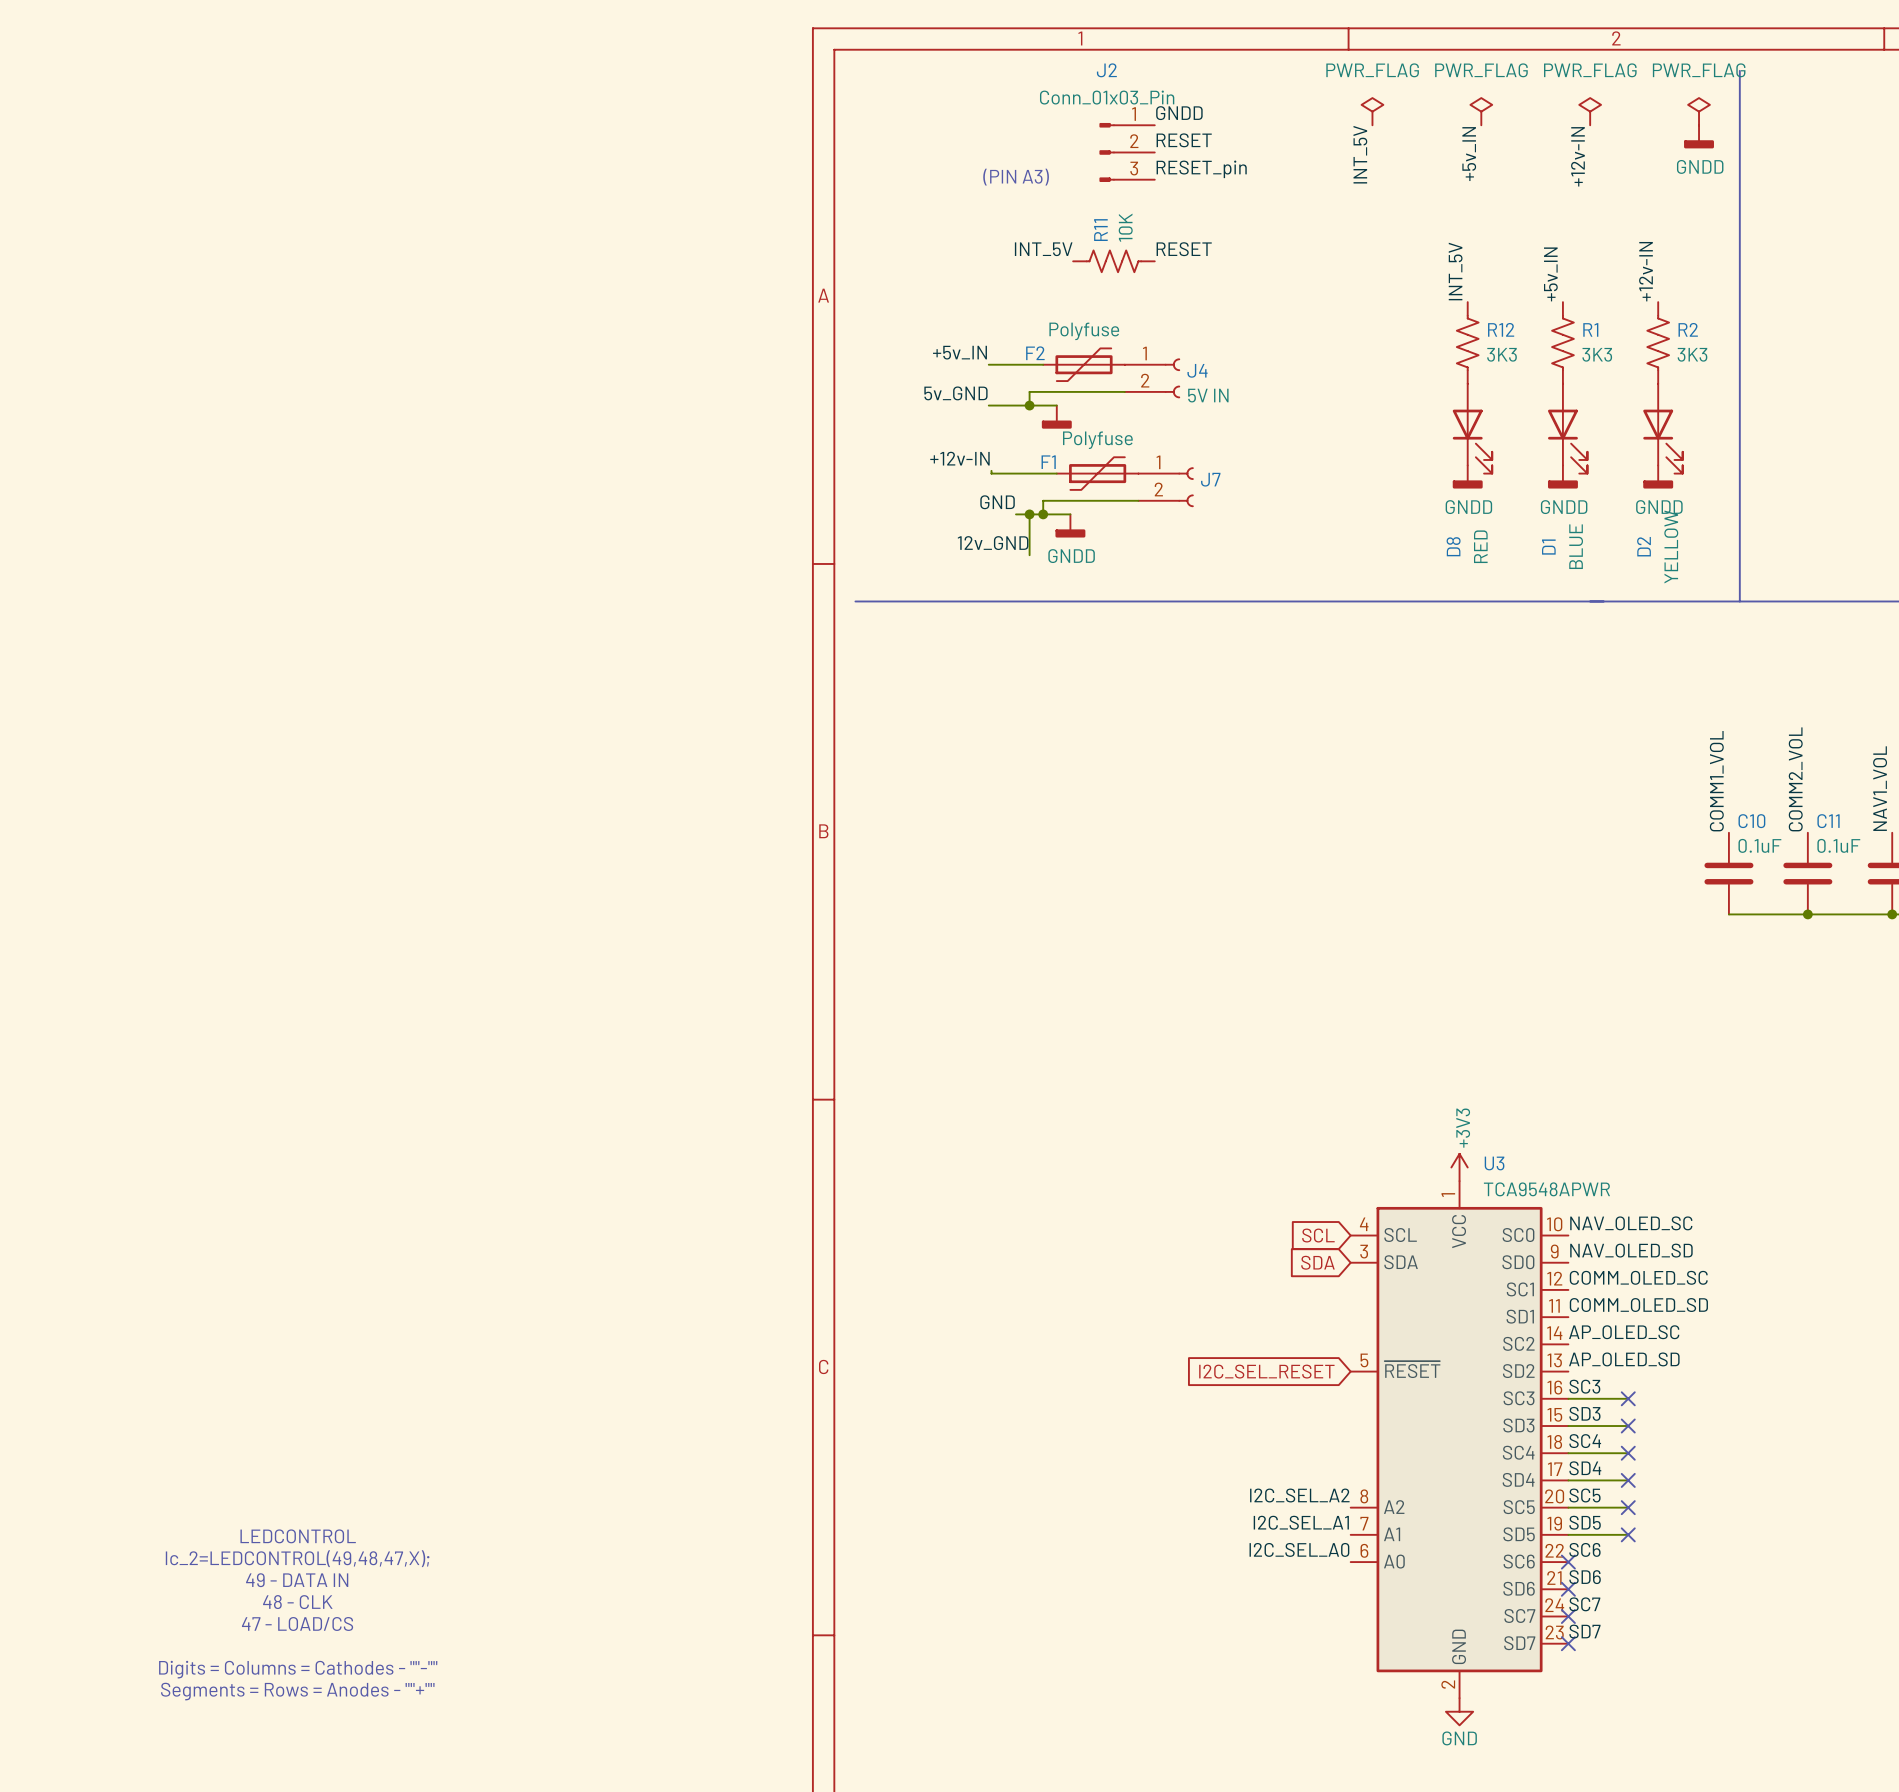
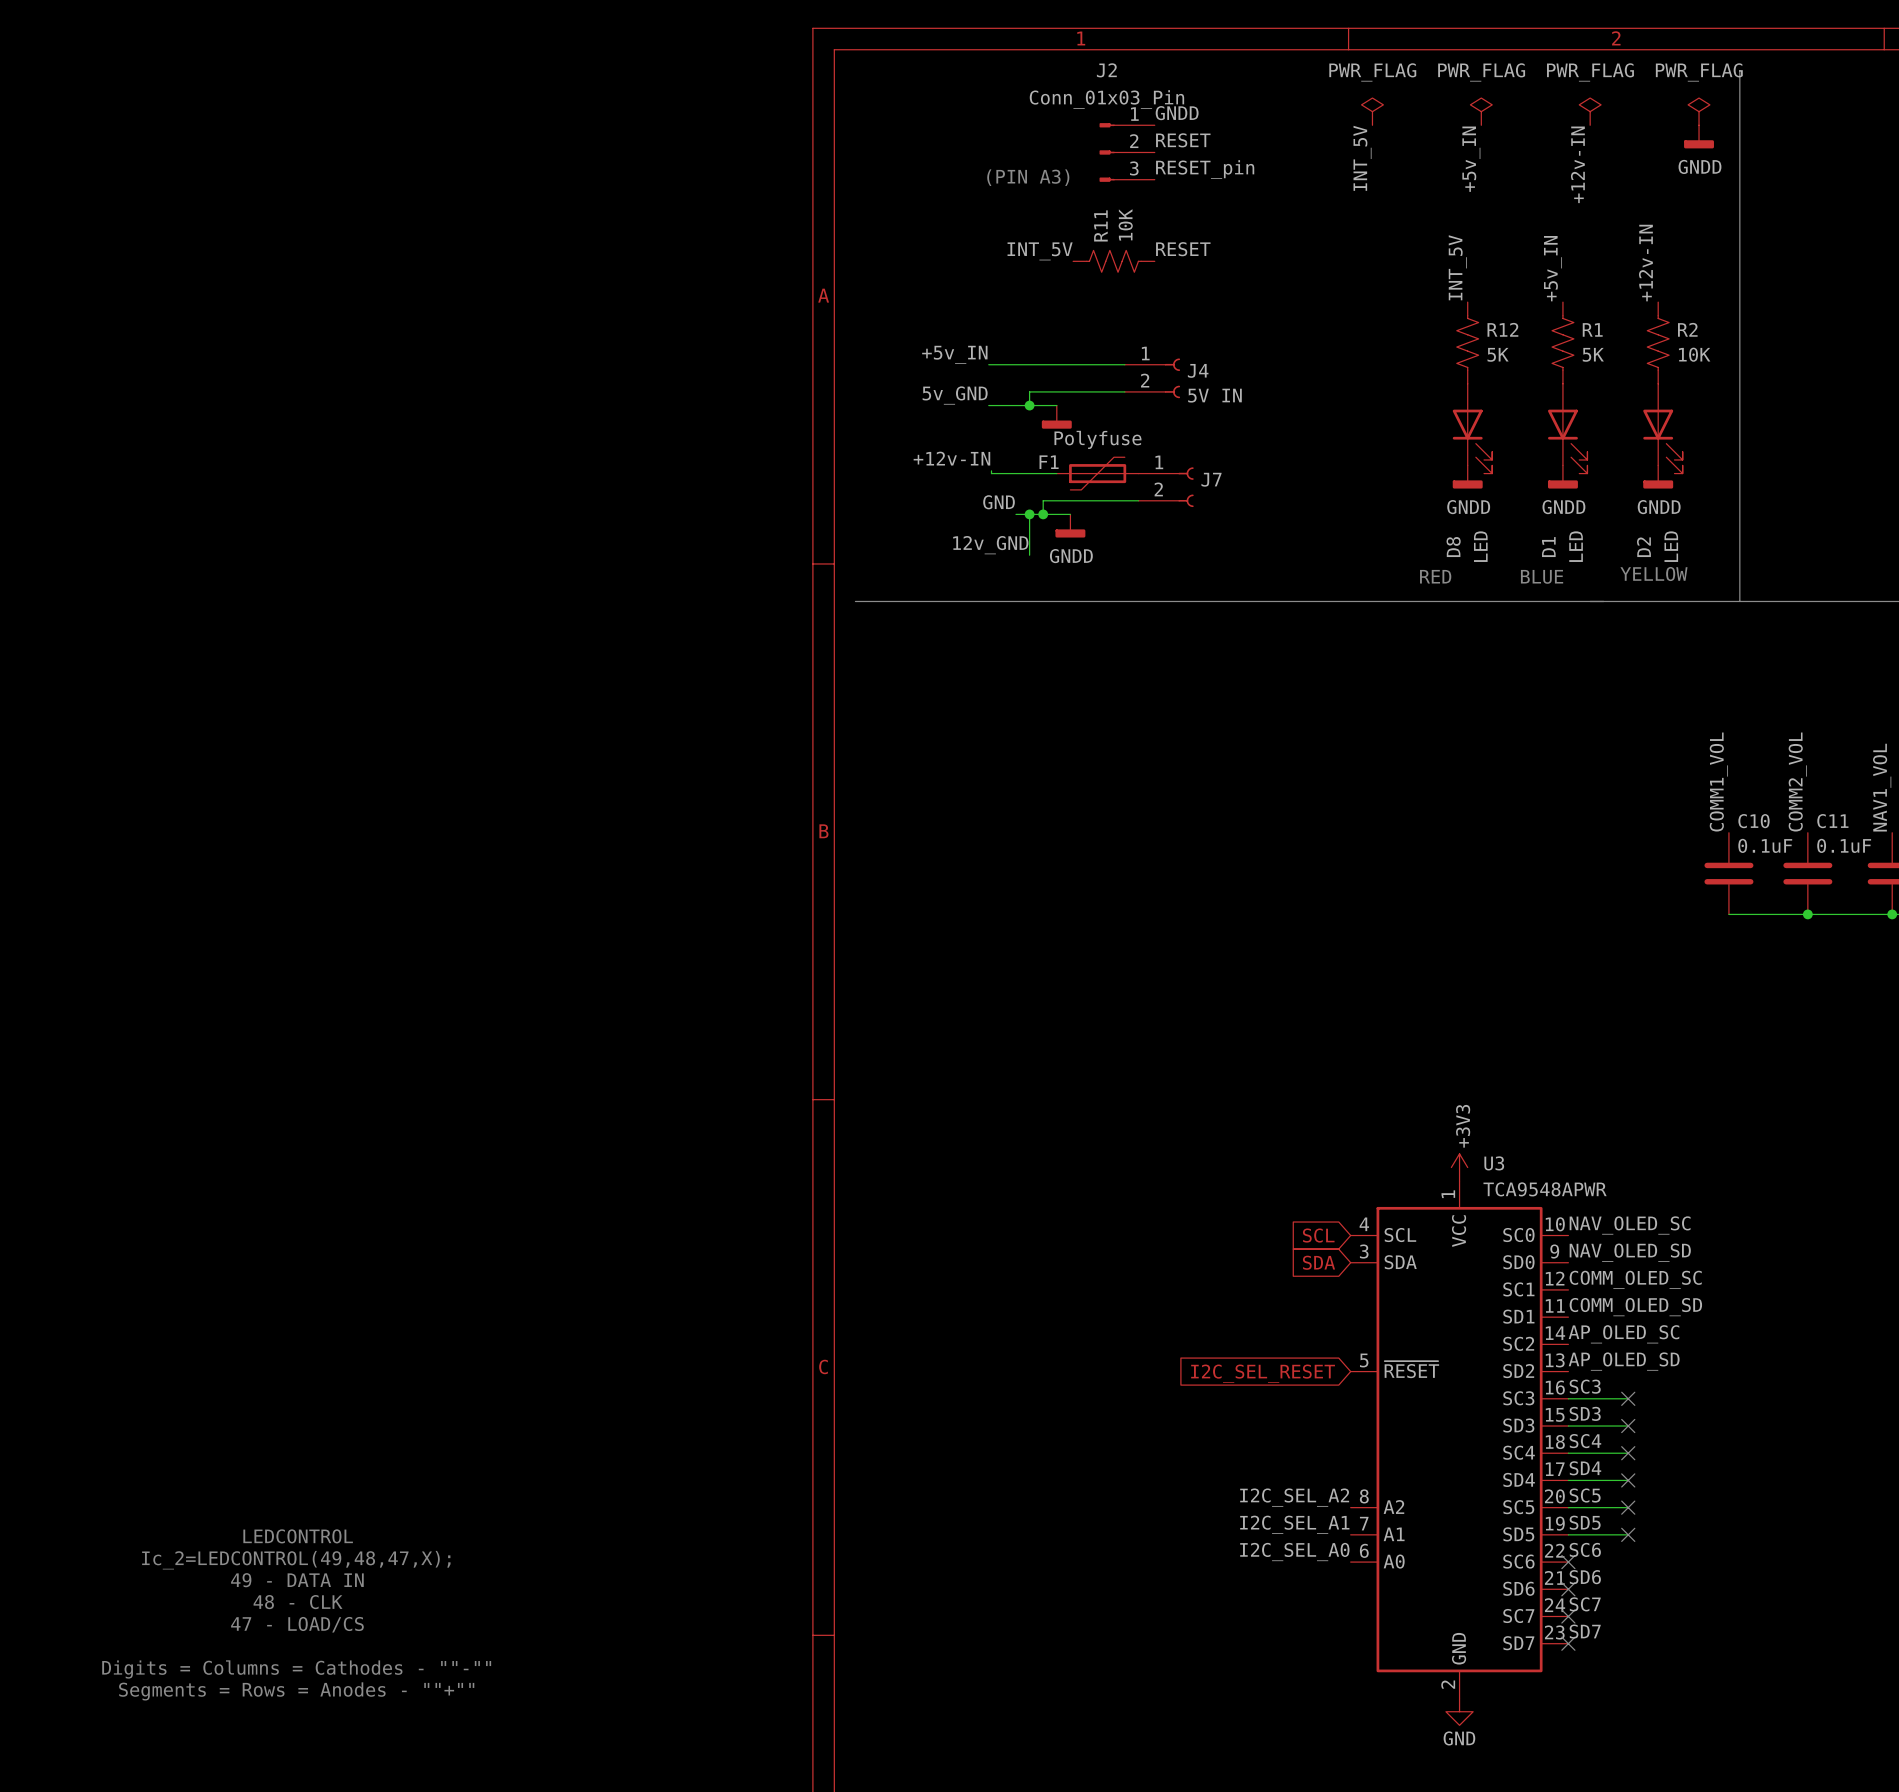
R12 value: 3K3 (1502, 354) -> 5K (1498, 354)
R1 value: 3K3 (1597, 354) -> 5K (1593, 354)
R2 value: 3K3 (1692, 354) -> 10K (1694, 354)
F2: Polyfuse (1084, 364) -> none
D8 value: RED (1480, 546) -> LED (1480, 546)
D1 value: BLUE (1576, 546) -> LED (1576, 546)
D2 value: YELLOW (1671, 546) -> LED (1671, 546)
text: none -> YELLOW (1653, 574)
text: none -> RED (1435, 576)
text: none -> BLUE (1542, 576)

